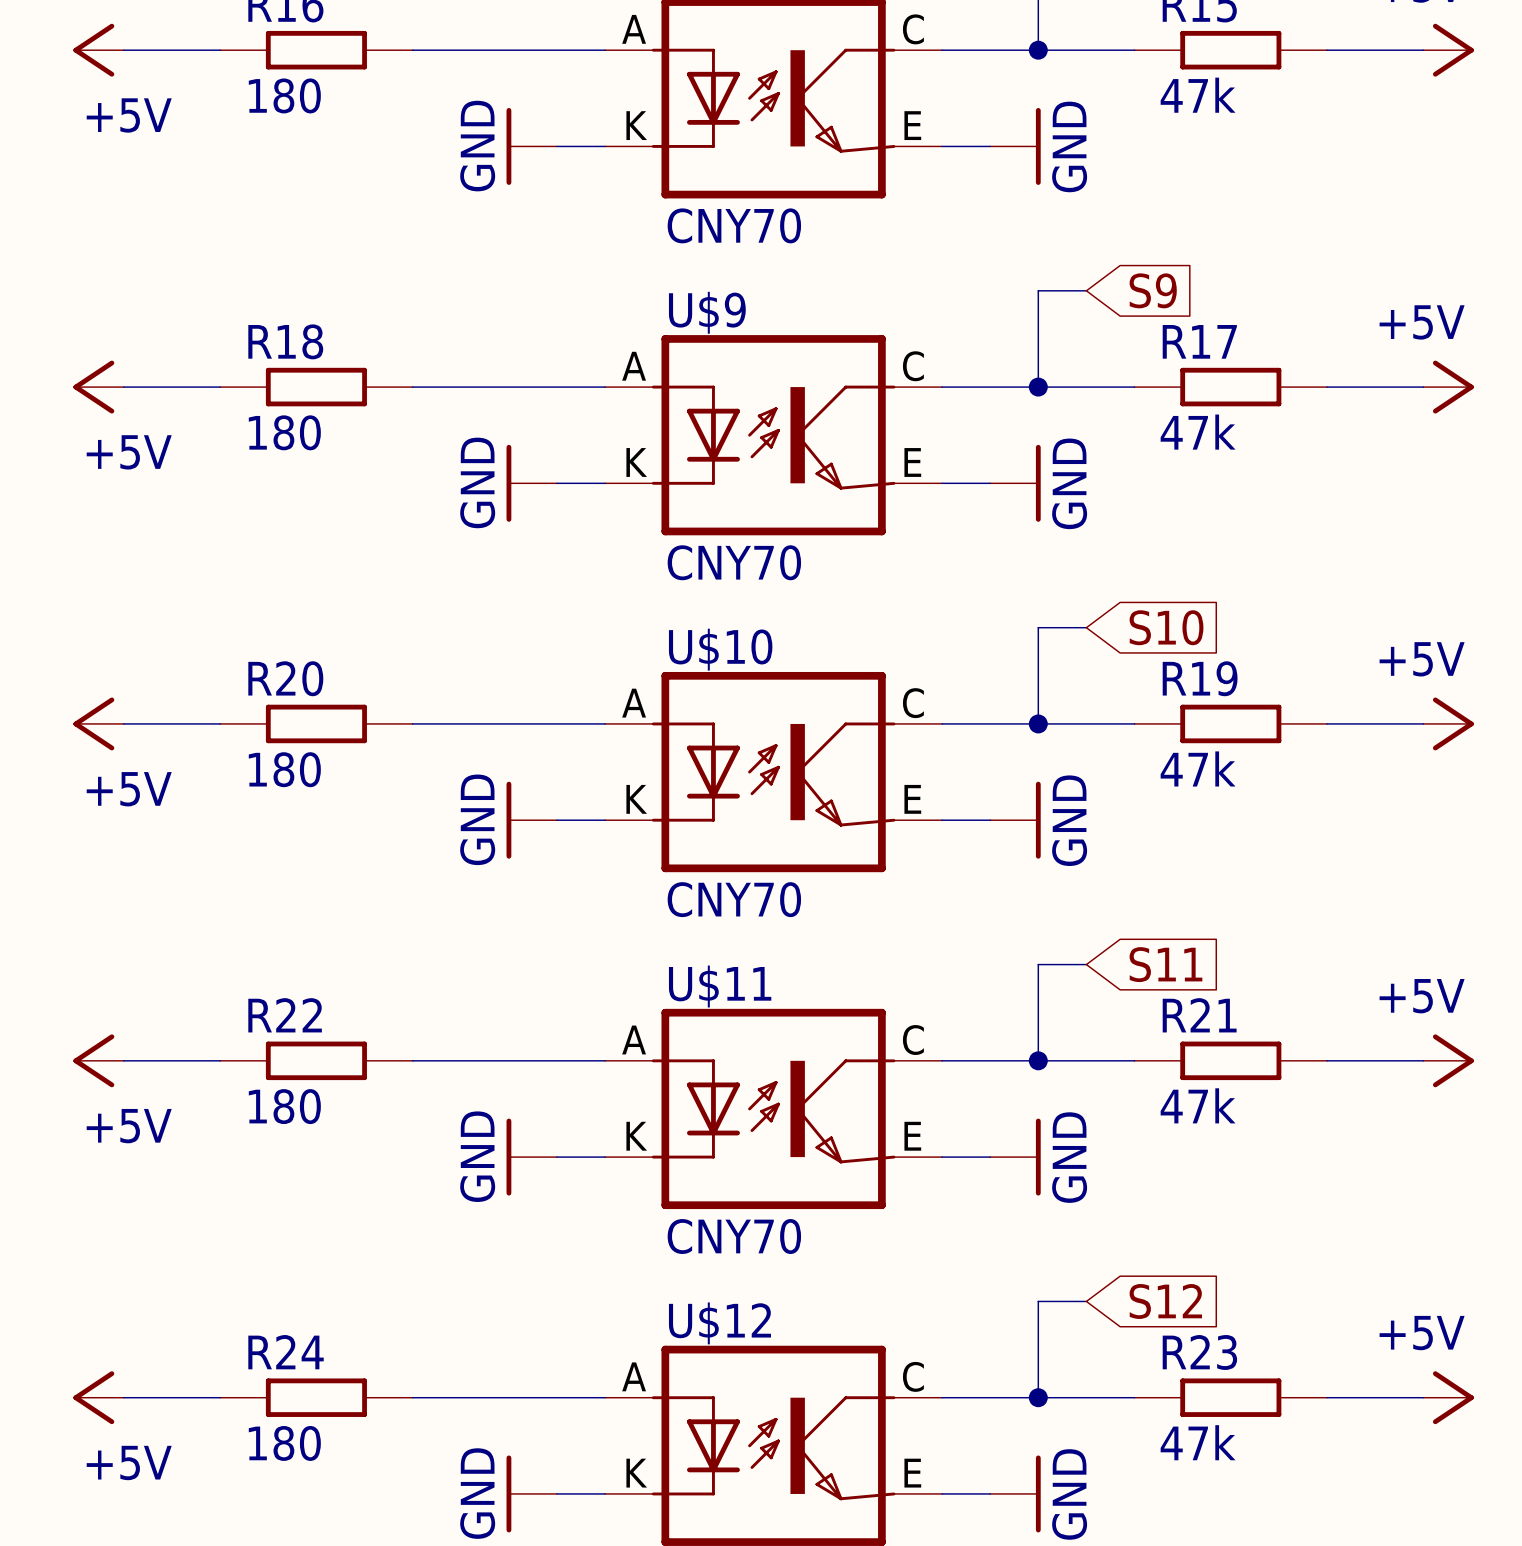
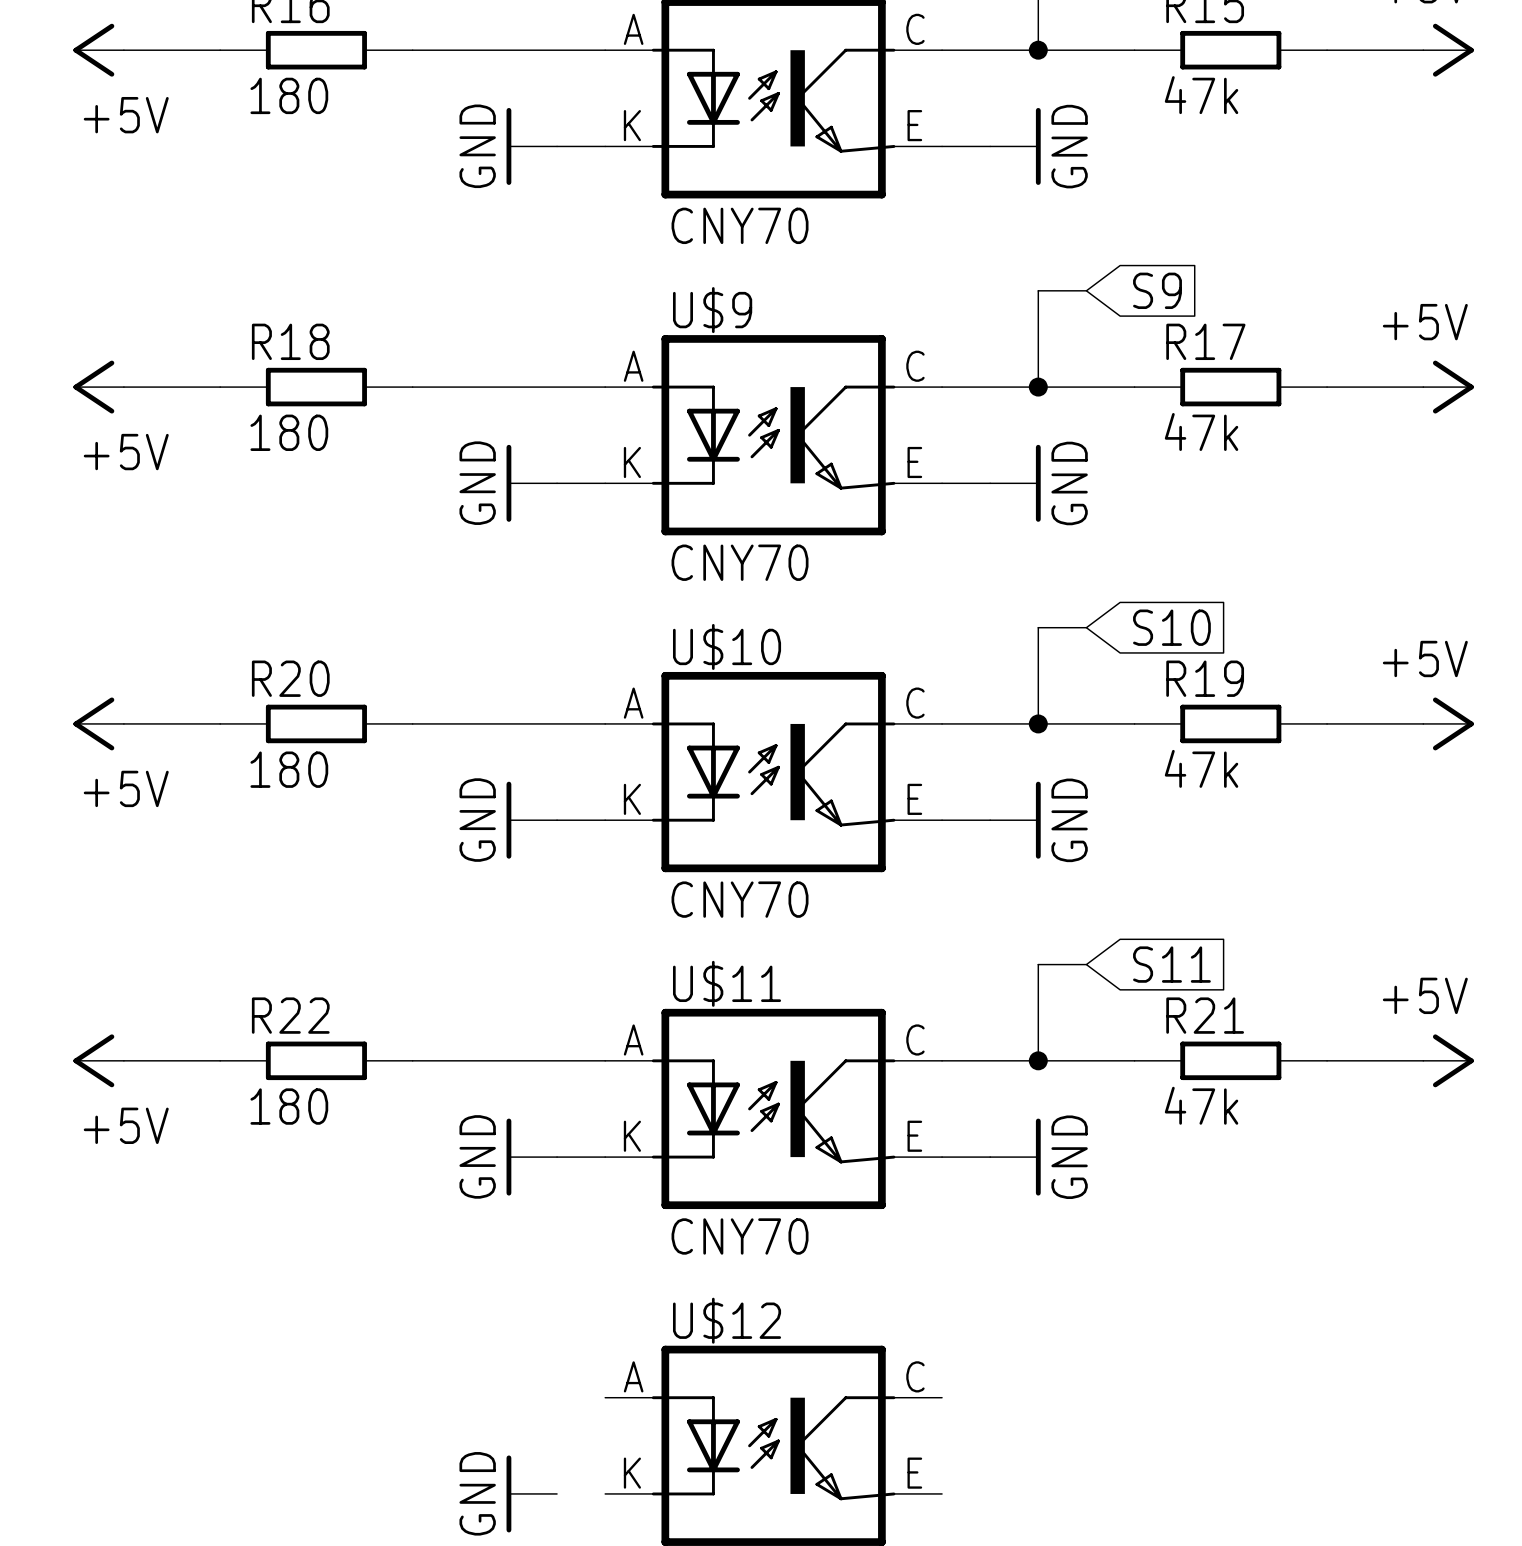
wire: (1086, 1301) (1038, 1301) (1038, 1397) -> none
global label: S12 (1165, 1301) -> none
power symbol: +5V (98, 1397) -> none
wire: (123, 1397) (220, 1397) -> none
R24: 180 (316, 1397) -> none
wire: (412, 1397) (605, 1397) -> none
wire: (942, 1397) (1134, 1397) -> none
junction: (1038, 1397) -> none
R23: 47k (1230, 1397) -> none
wire: (1327, 1397) (1423, 1397) -> none
power symbol: +5V (1448, 1397) -> none
wire: (557, 1493) (605, 1493) -> none
wire: (942, 1493) (990, 1493) -> none
power symbol: GND (1015, 1493) -> none

